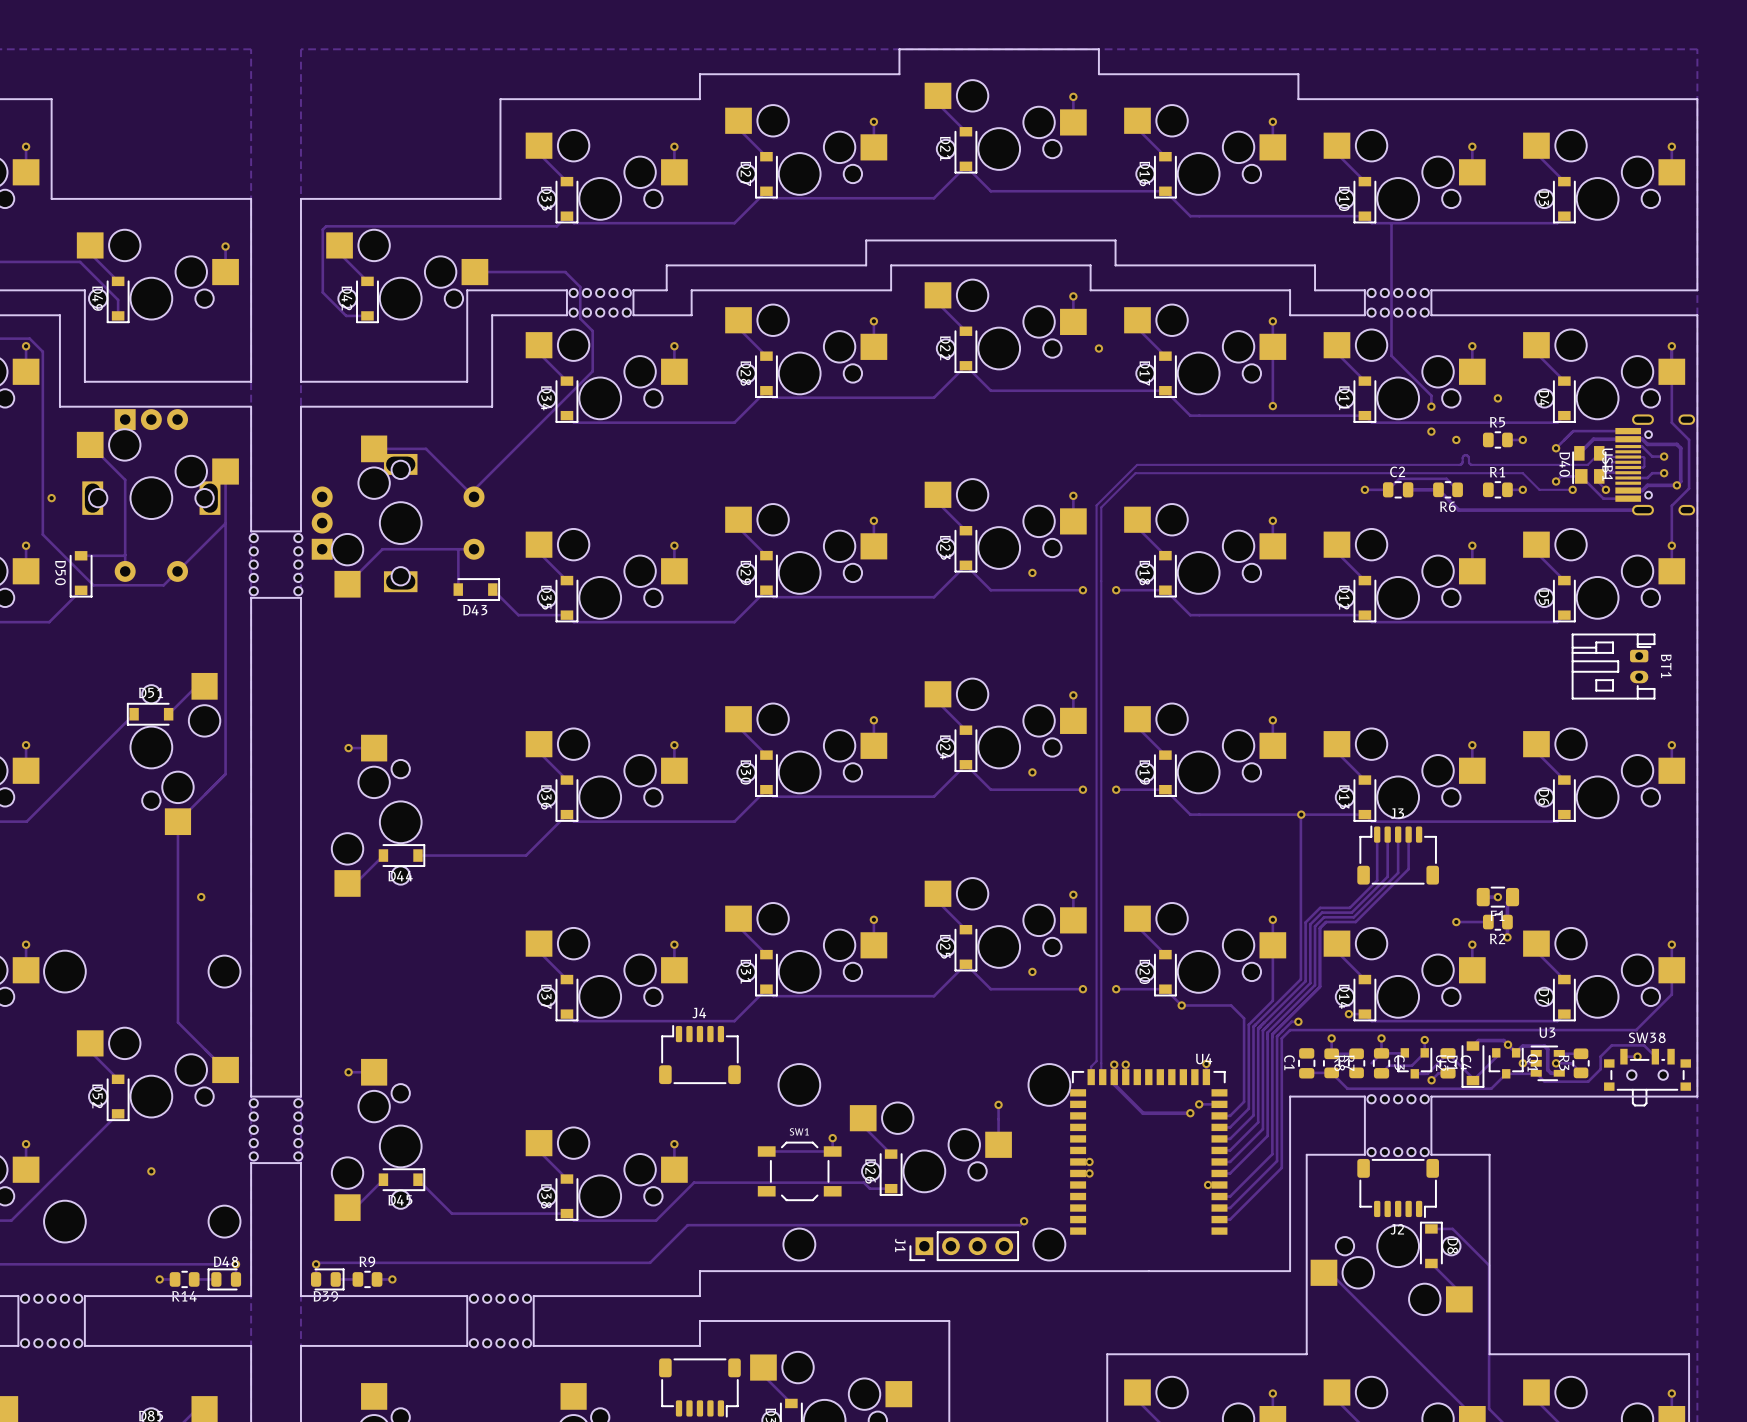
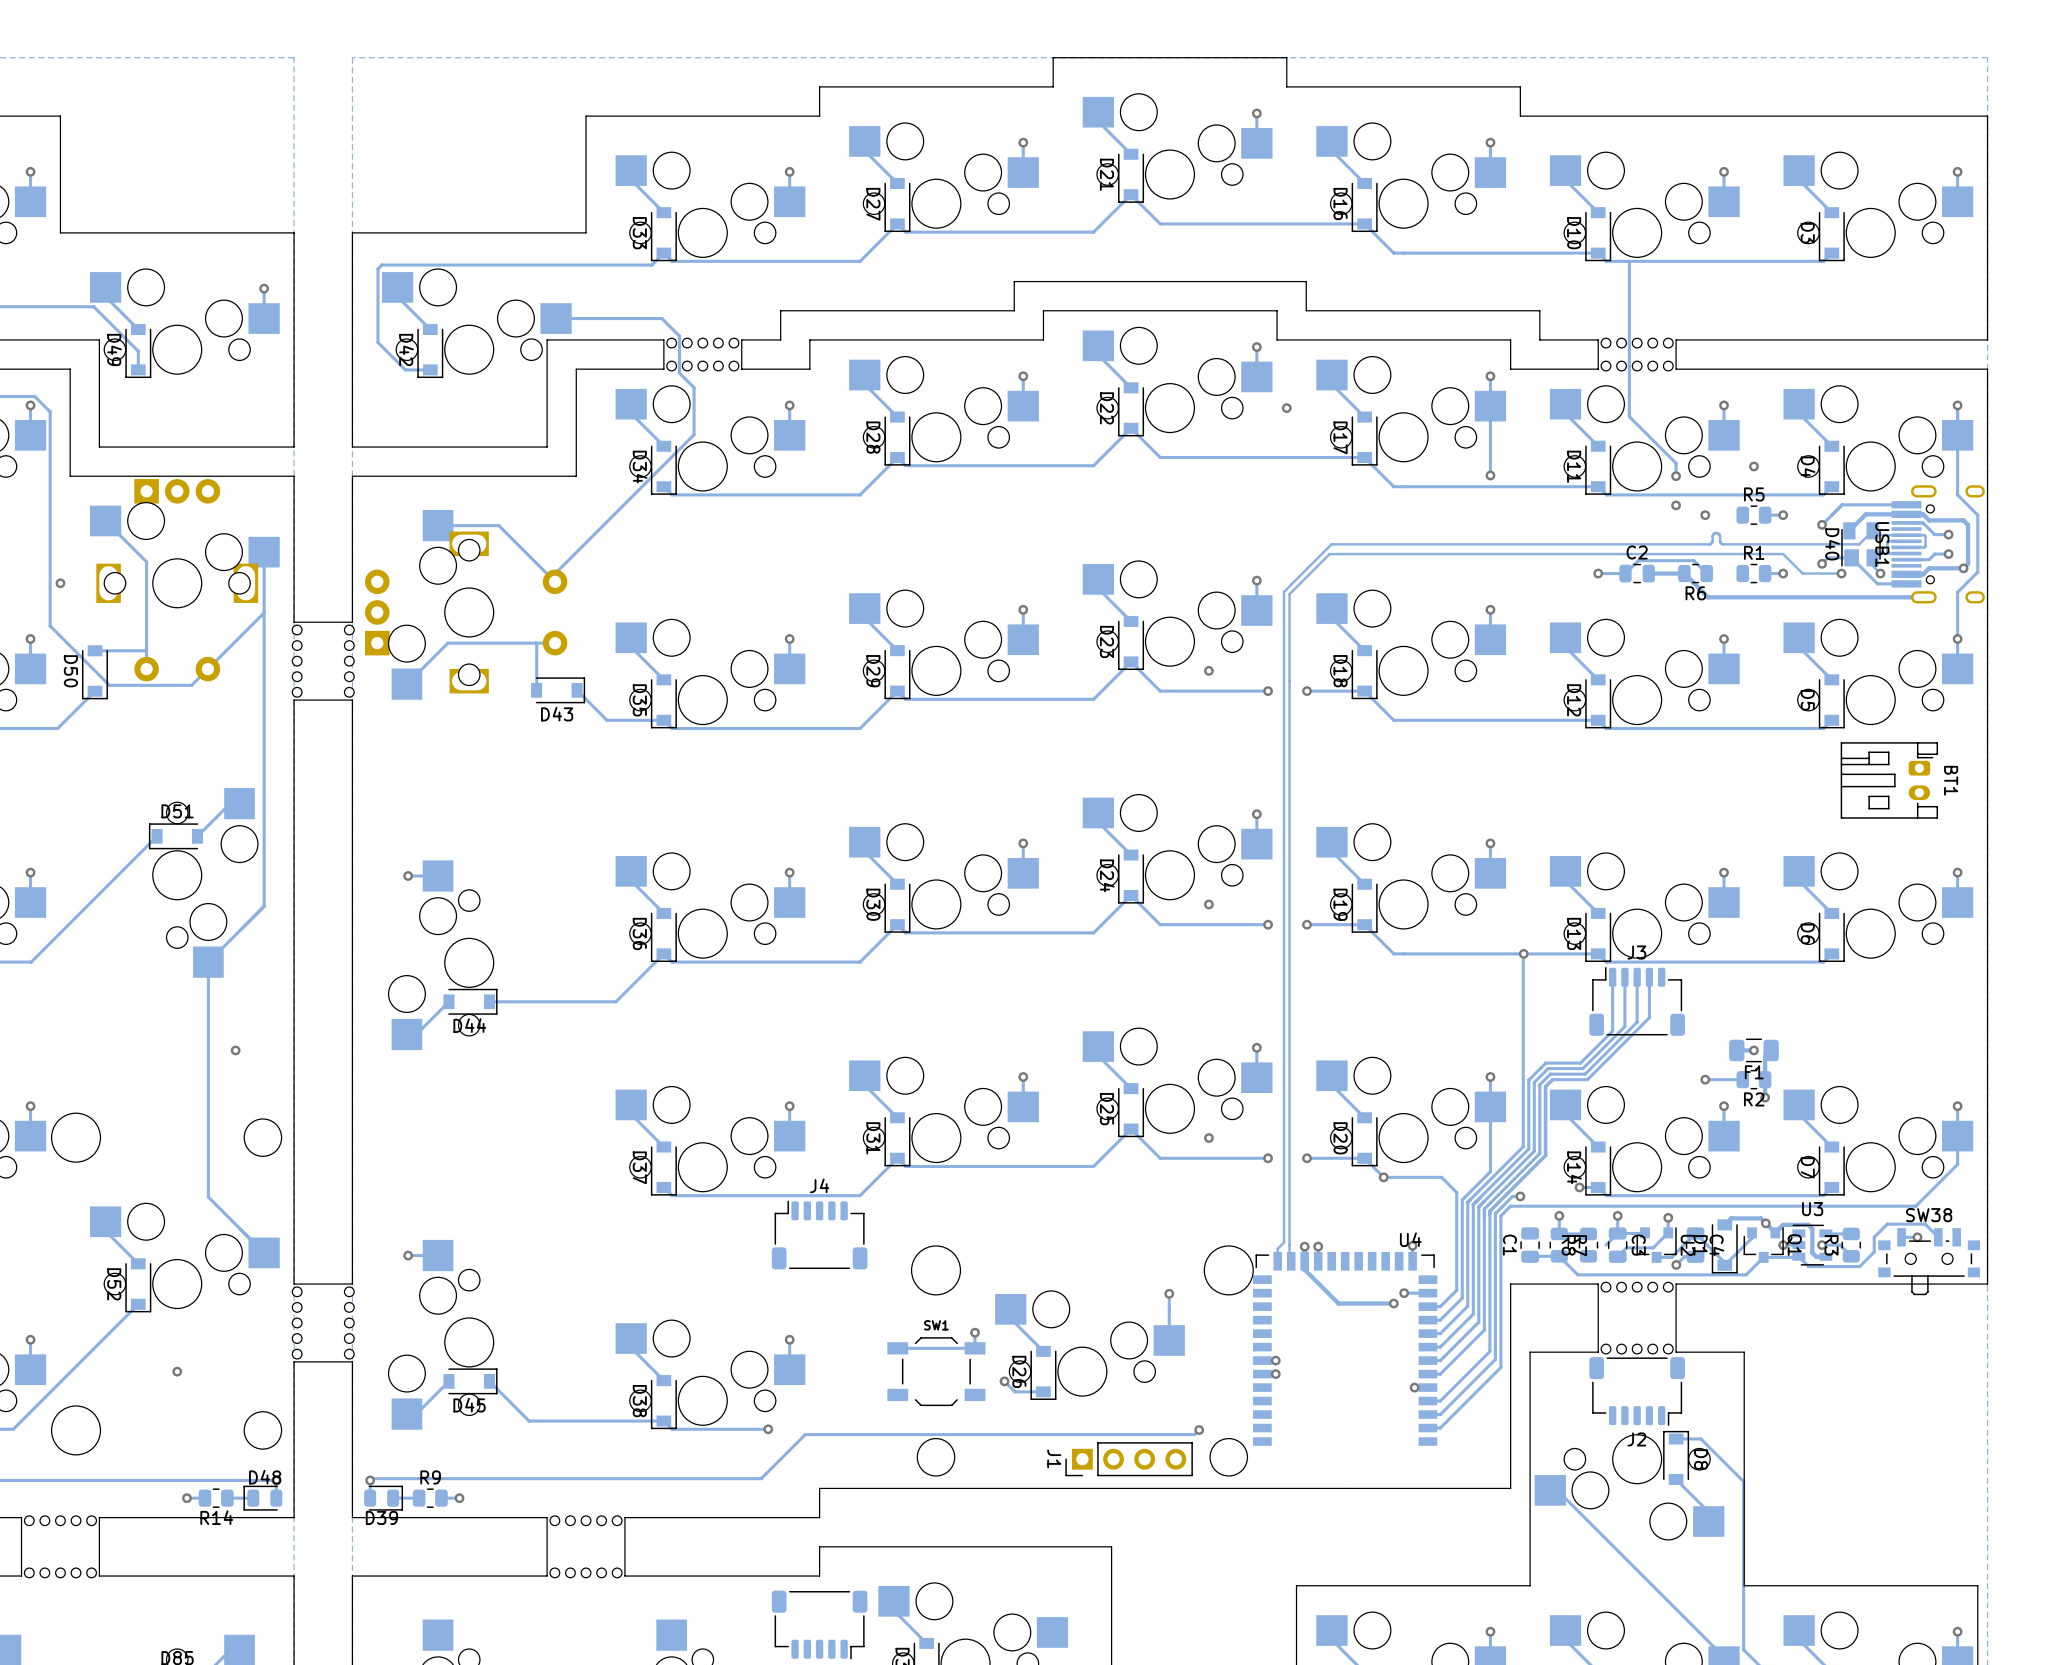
via: none -> (1004, 1381)
track: (869, 1188) (863, 1182) (694, 1182) (656, 1220) -> (1018, 1391) (1015, 1391) (1004, 1381)
via: none -> (768, 1429)

